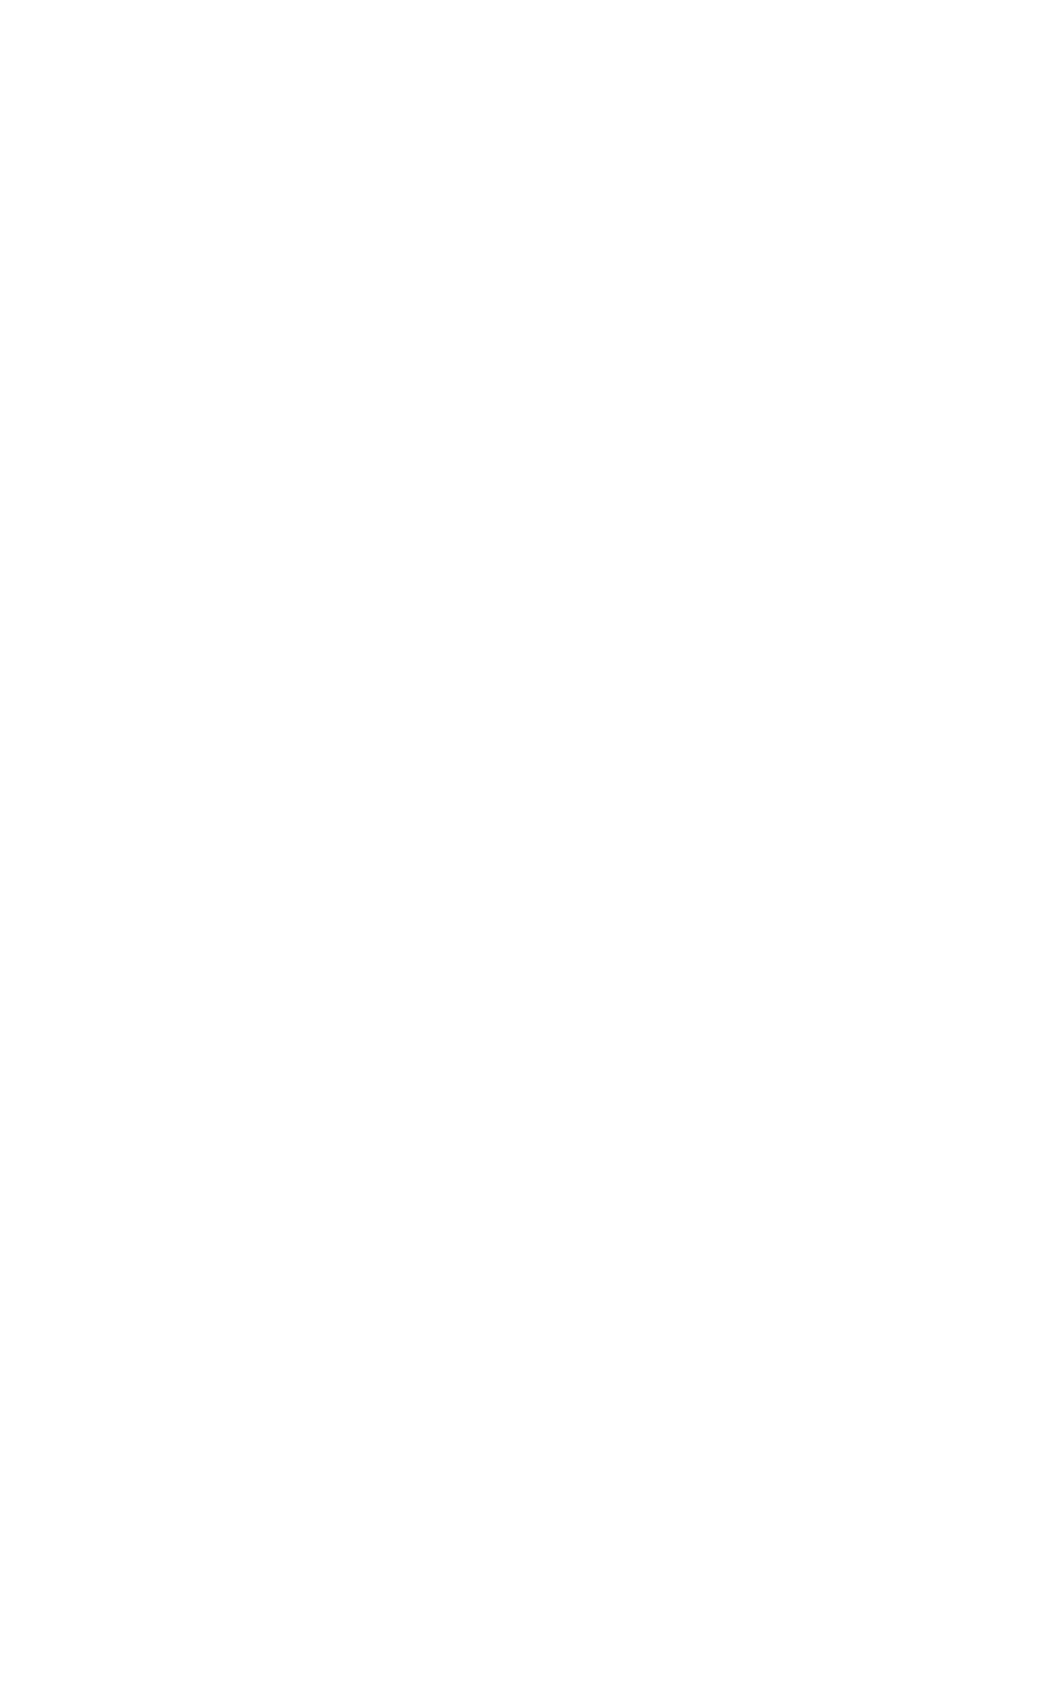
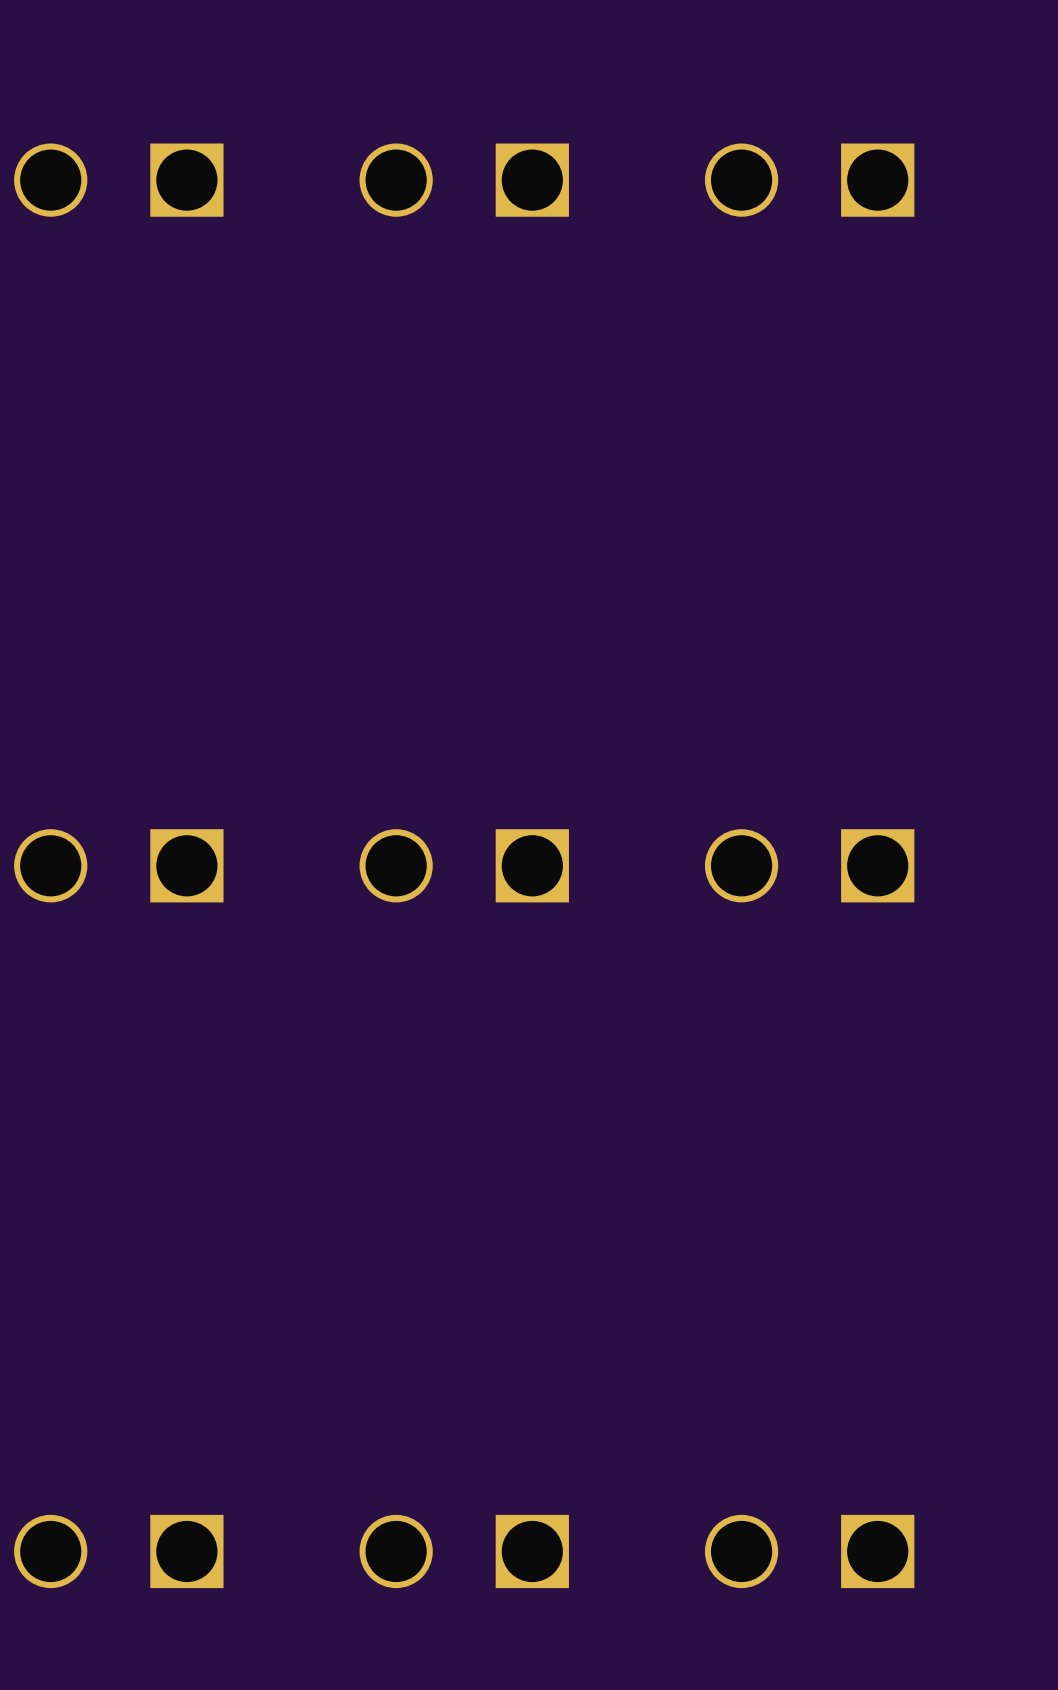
part: none -> (118, 180)
part: none -> (464, 180)
part: none -> (809, 180)
part: none -> (118, 865)
part: none -> (464, 865)
part: none -> (809, 865)
part: none -> (118, 1551)
part: none -> (464, 1551)
part: none -> (809, 1551)

